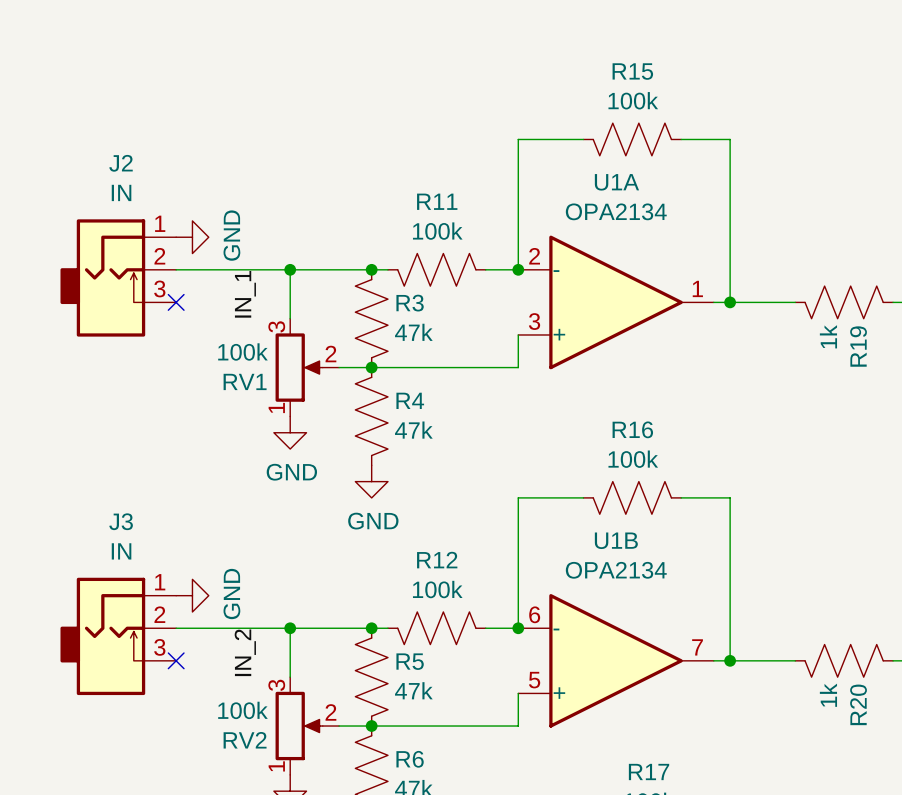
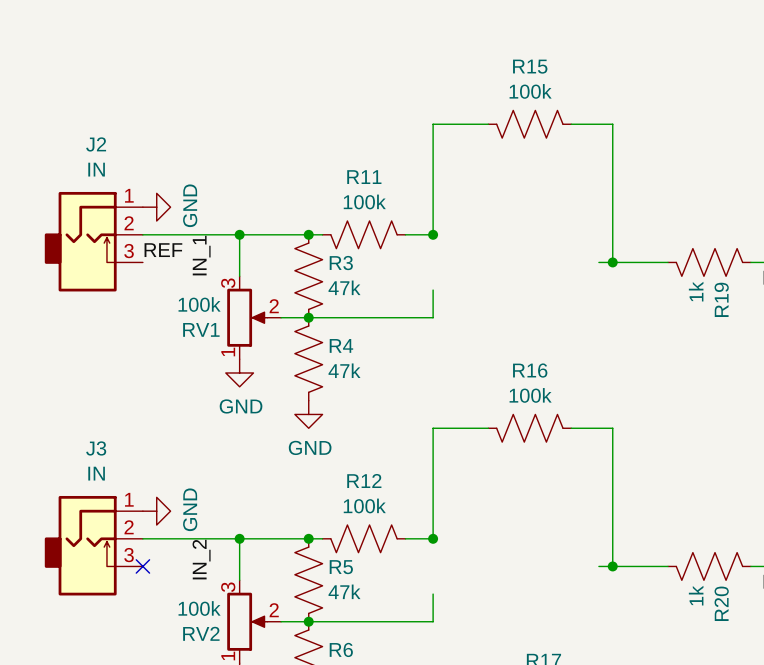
label: none -> REF (163, 250)
no-connect mark: (176, 302) -> none
U1A: OPA2134 (616, 302) -> none
U1B: OPA2134 (616, 660) -> none

